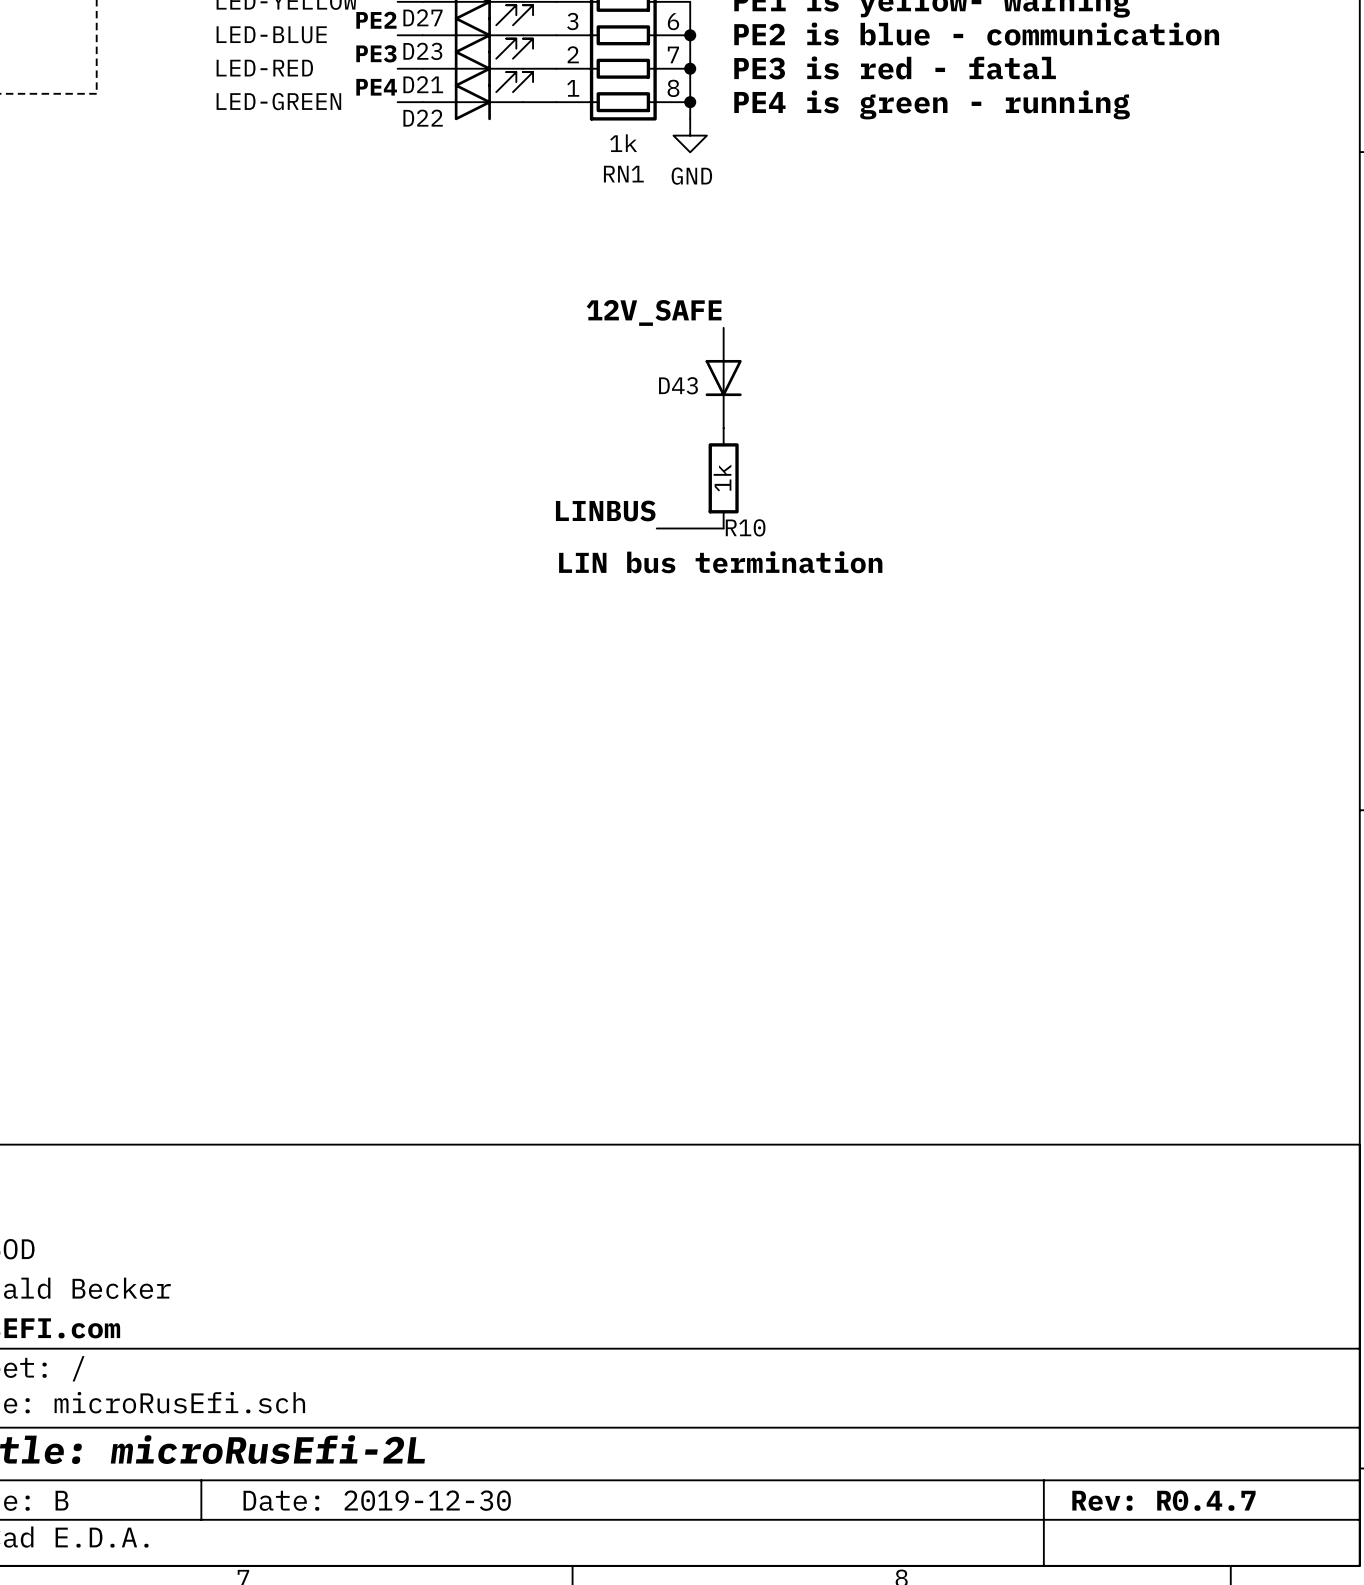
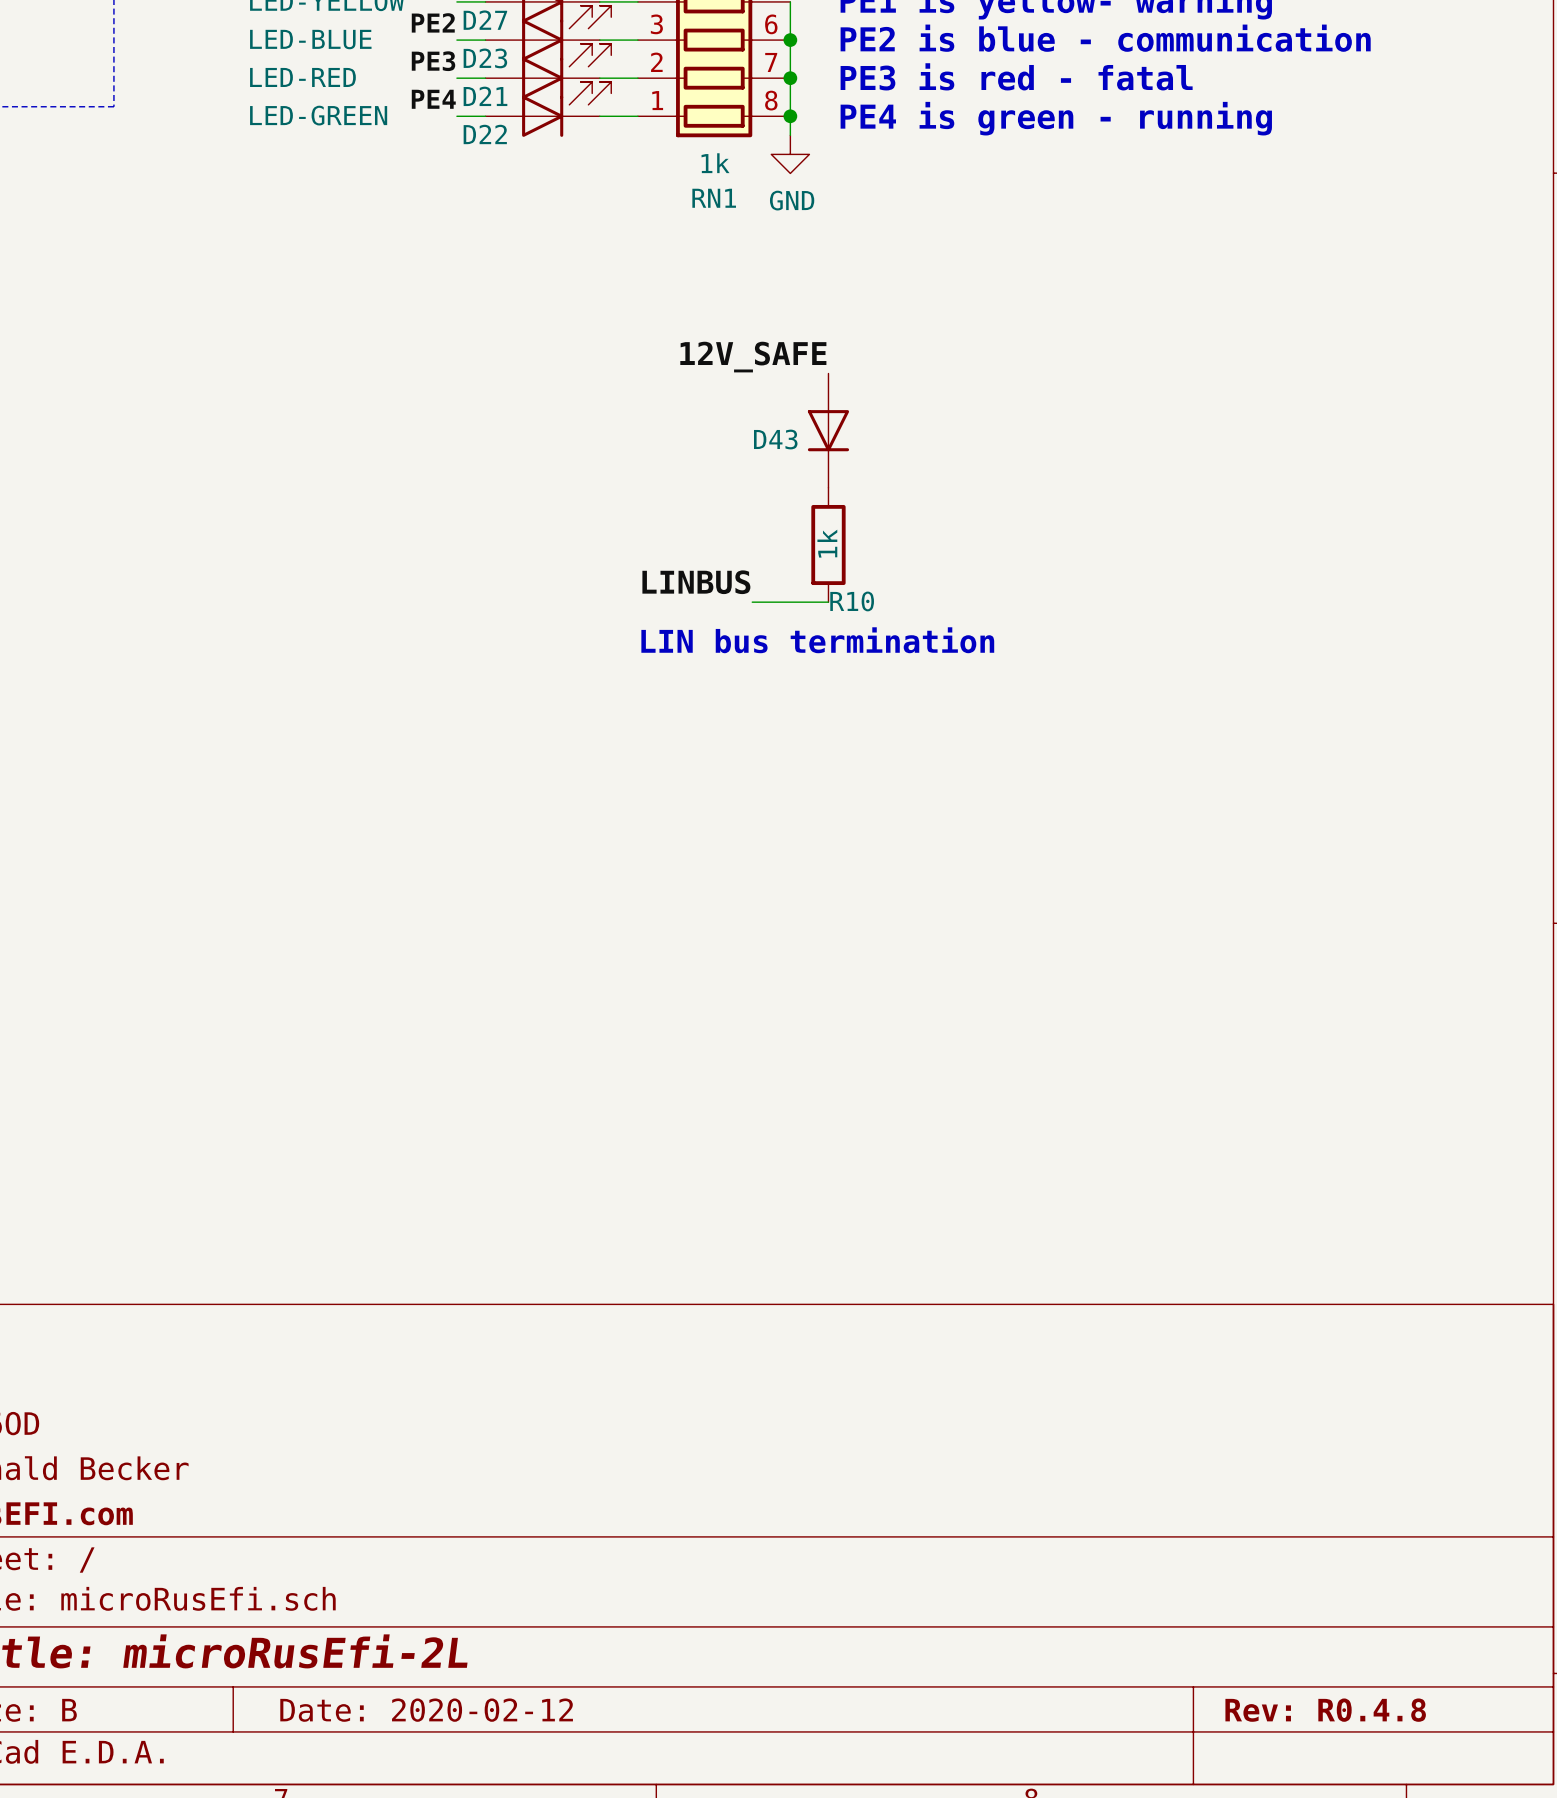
title block: Date: 2019-12-30 (377, 1500) -> Date: 2020-02-12 (426, 1710)
title block: Rev: R0.4.7 (1163, 1500) -> Rev: R0.4.8 (1325, 1710)

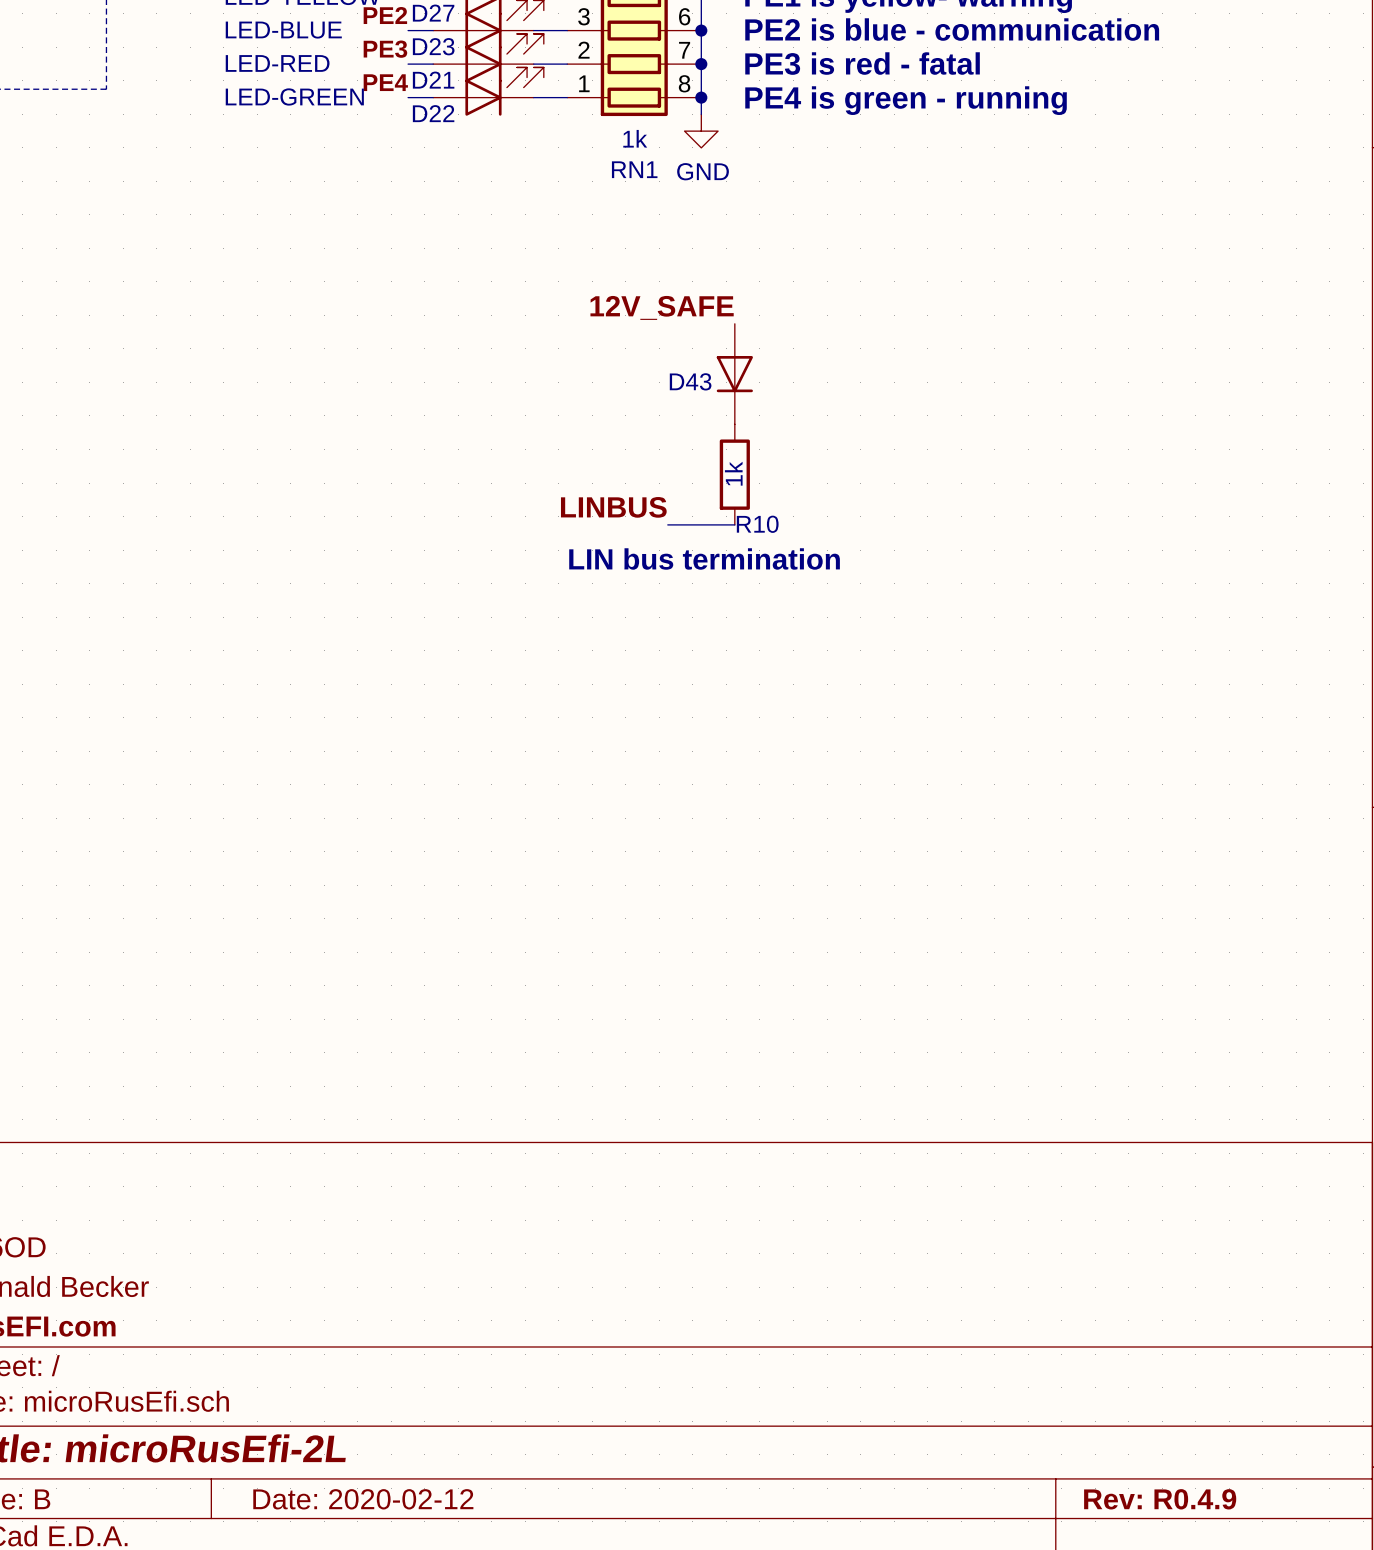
title block: Rev: R0.4.8 (1325, 1710) -> Rev: R0.4.9 (1160, 1499)

